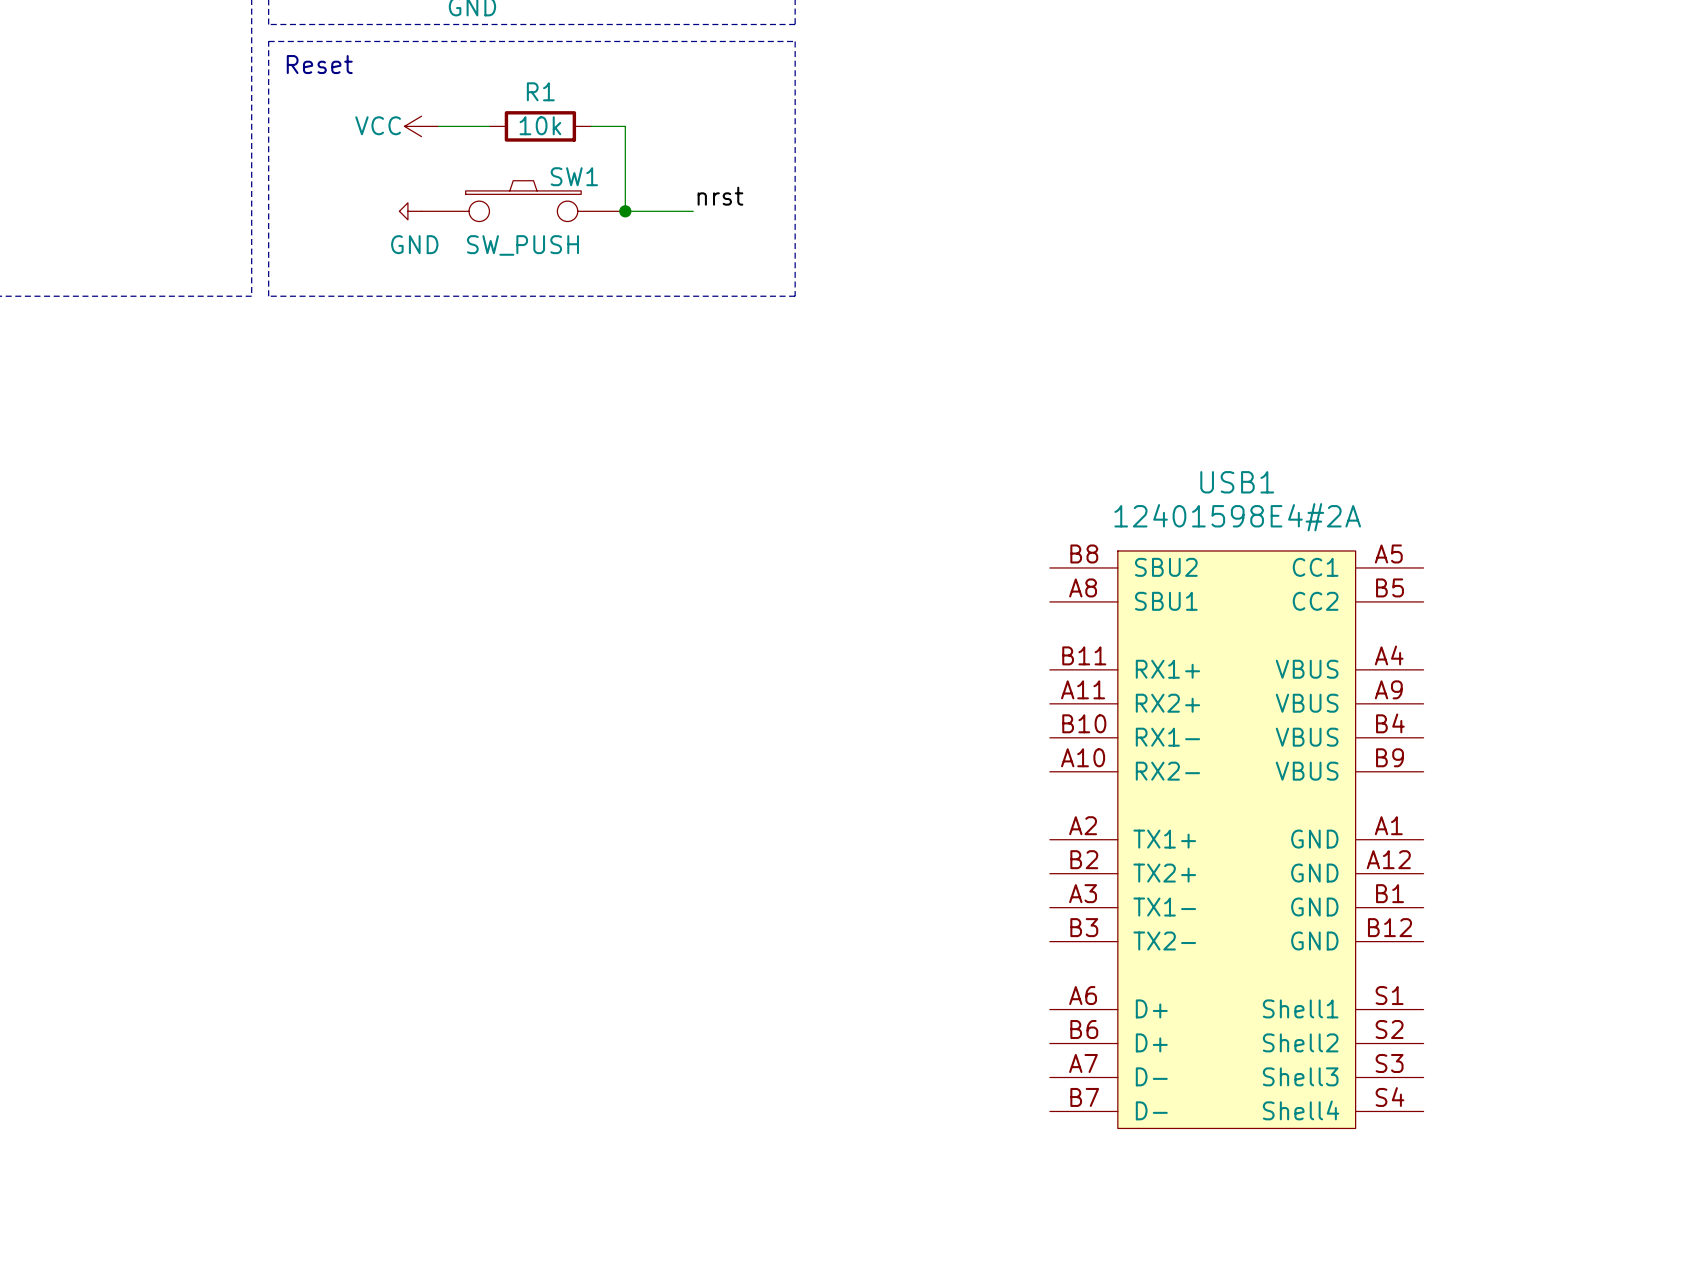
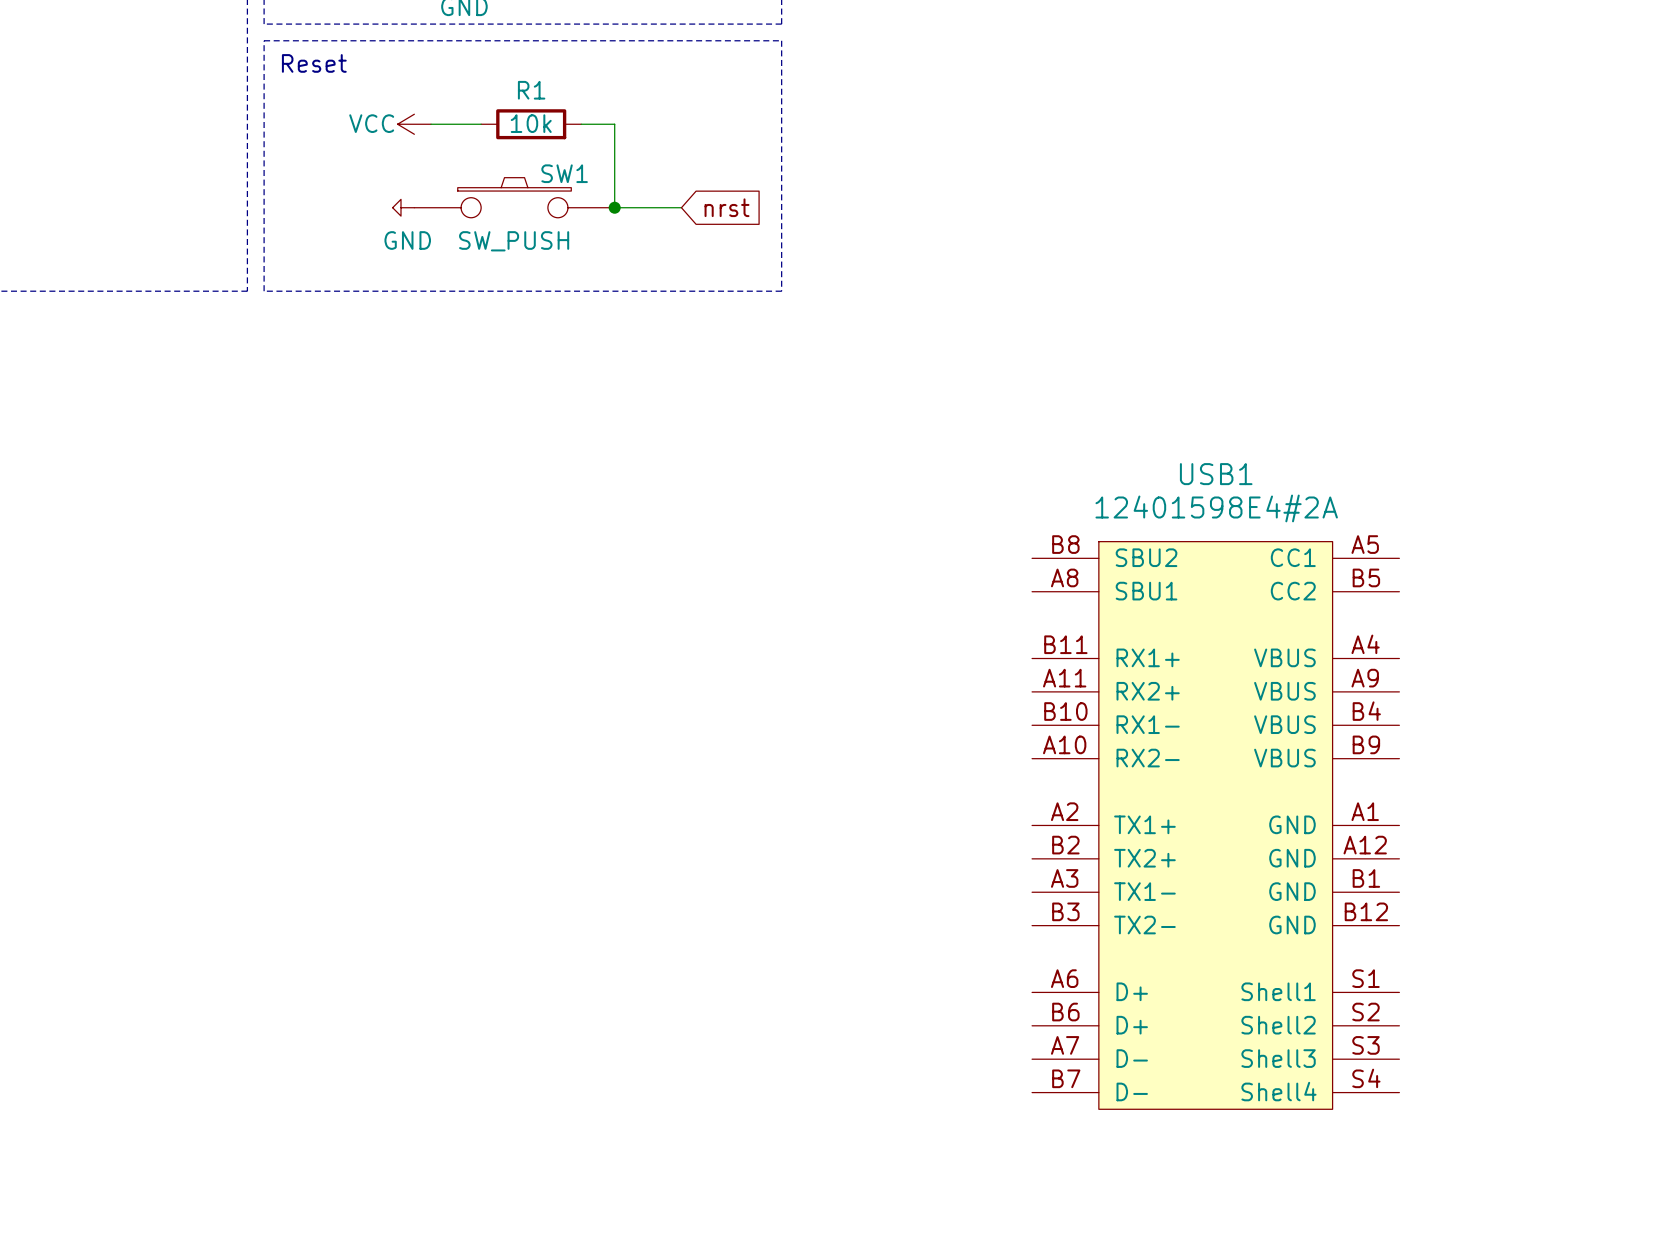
label: nrst (720, 196) -> none
global label: none -> nrst (727, 207)

